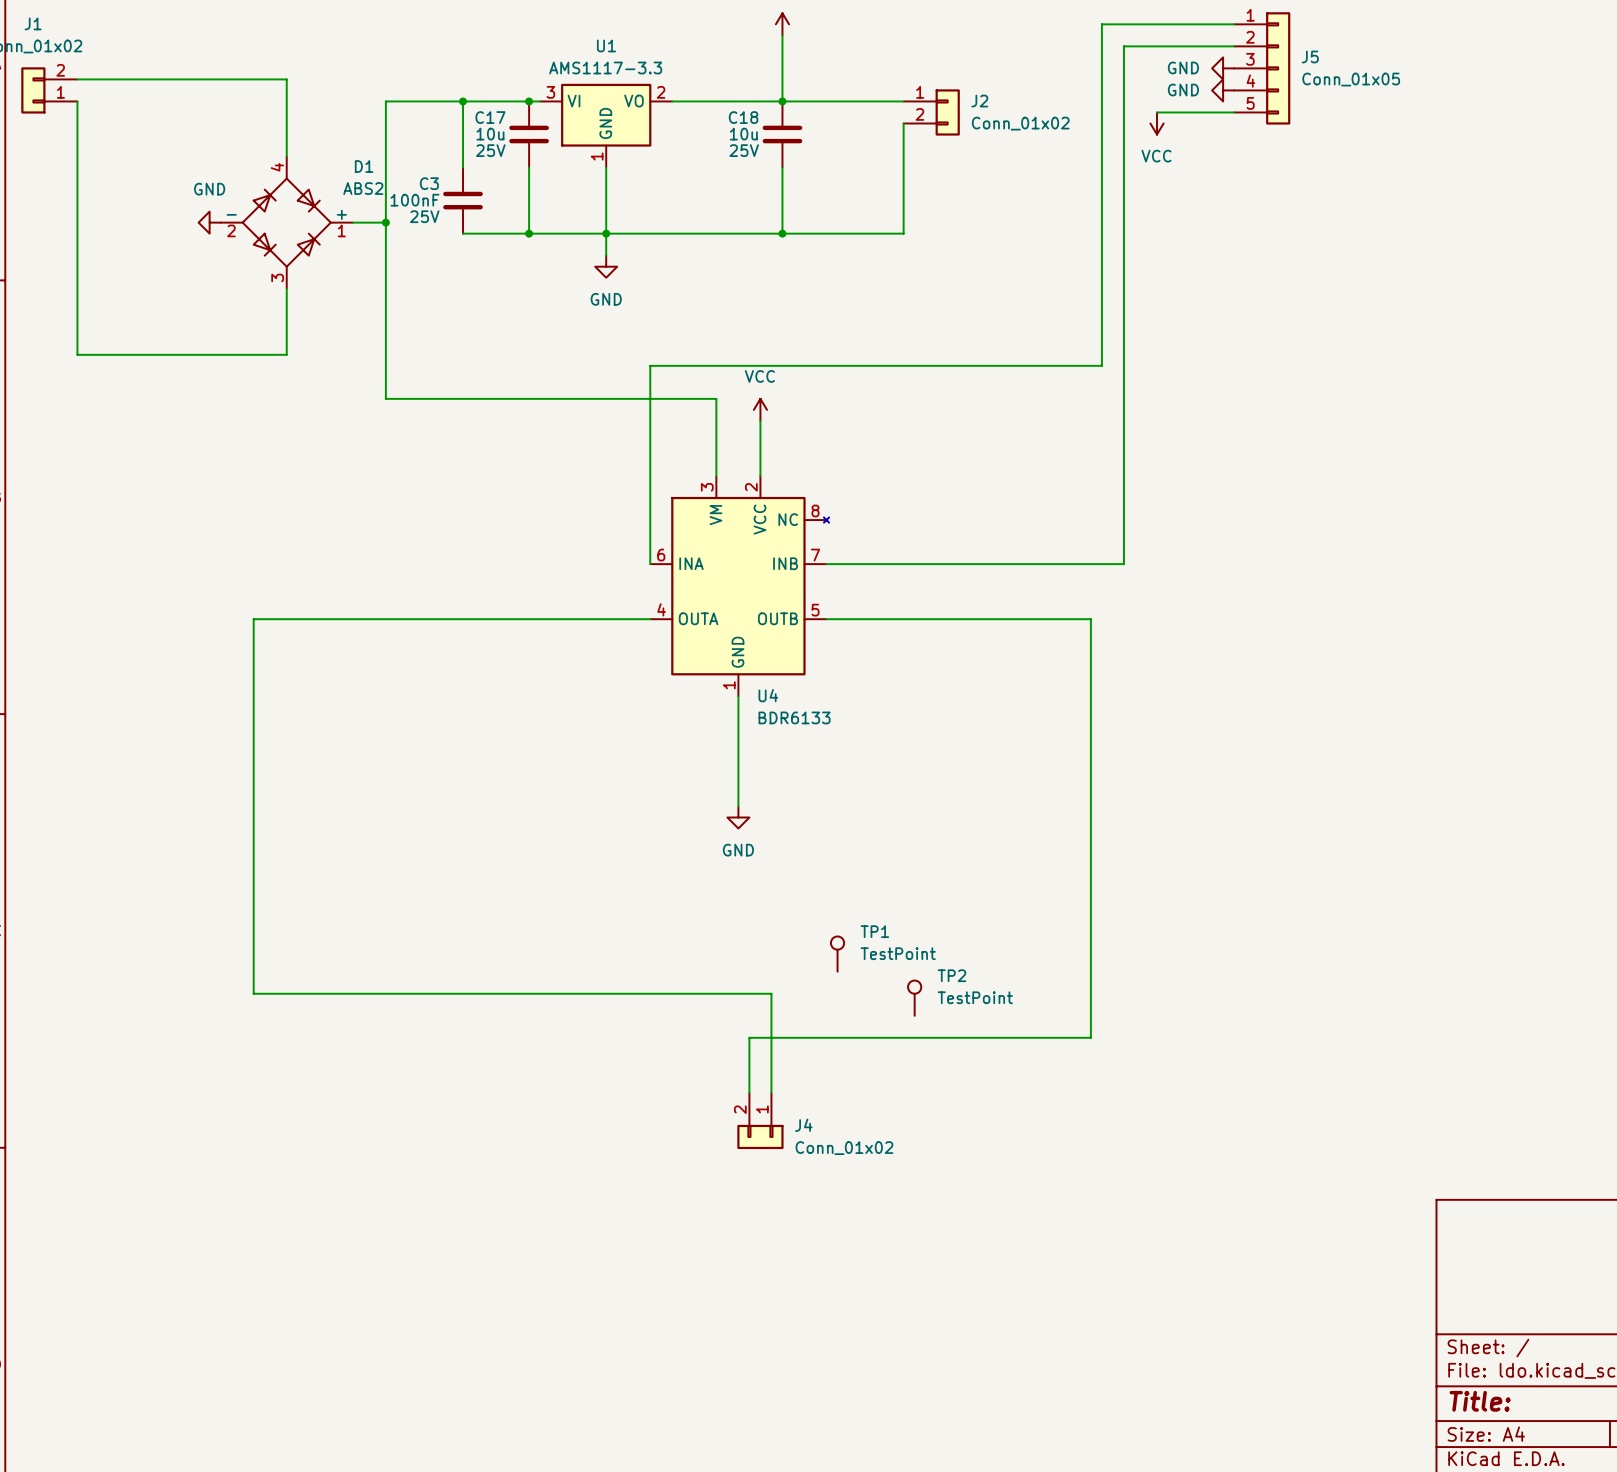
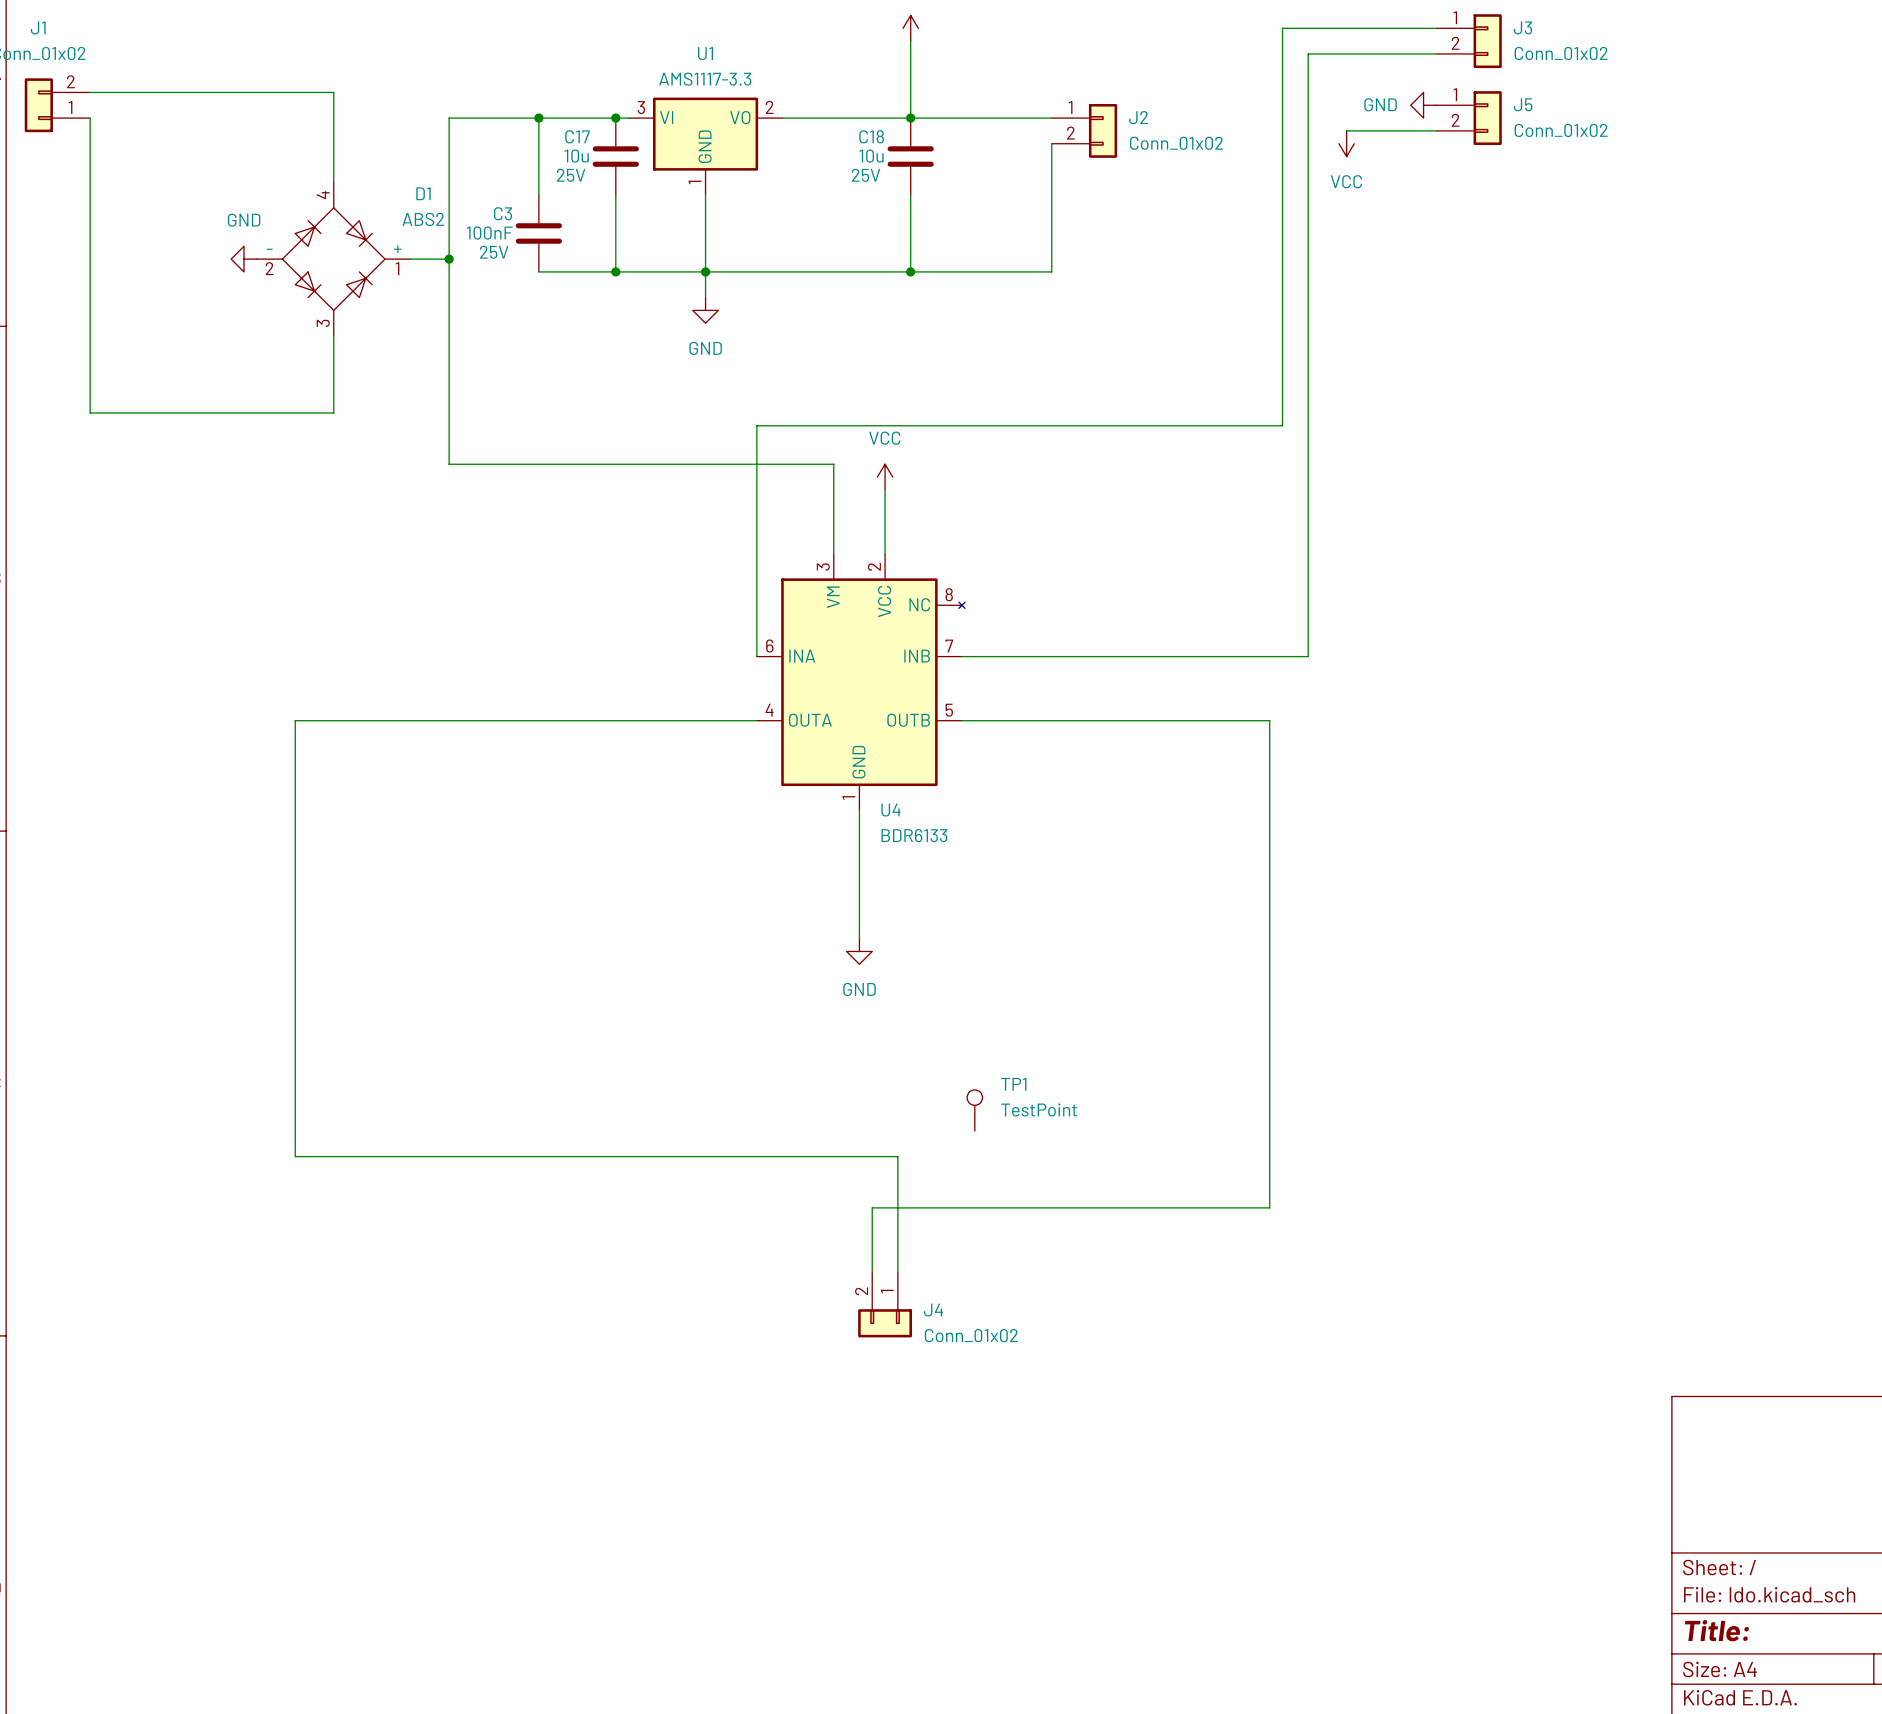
J5 symbol: [1234, 12, 1291, 125] -> [1436, 91, 1502, 146]
J3: none -> Conn_01x02 (1469, 41)
power symbol: GND (1223, 68) -> none
J5 value: Conn_01x05 (1351, 79) -> Conn_01x02 (1561, 130)
TP2: TestPoint (914, 998) -> none

